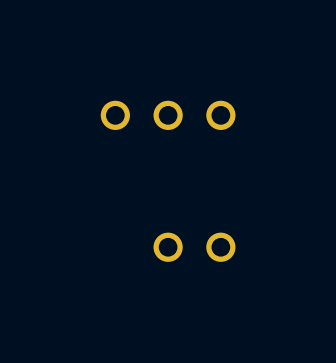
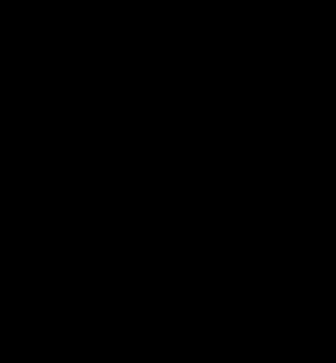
part: (168, 115) -> none
part: (194, 247) -> none

